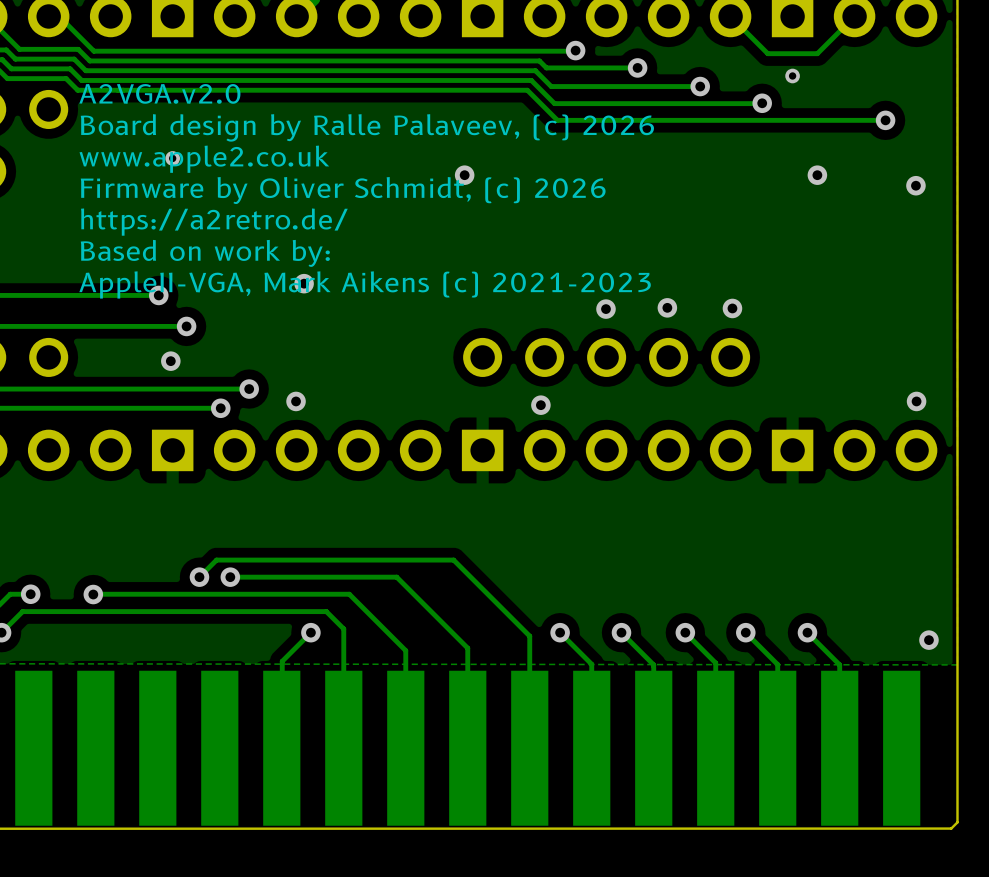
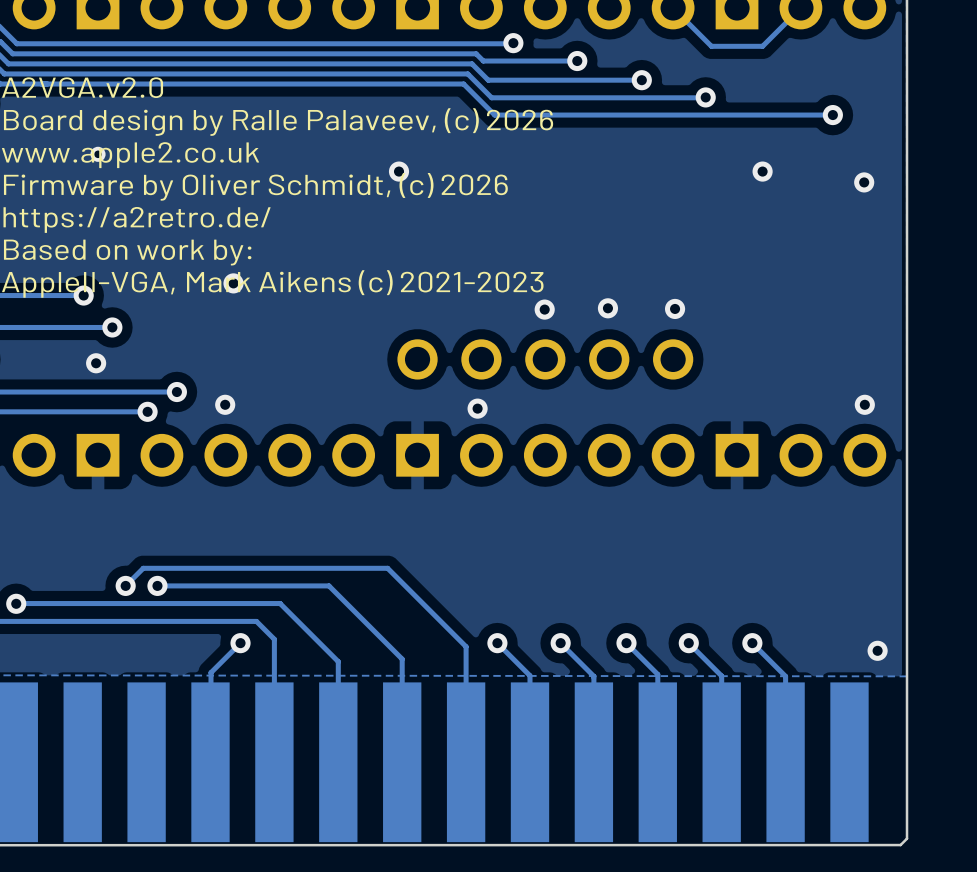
via: (792, 75) -> none

